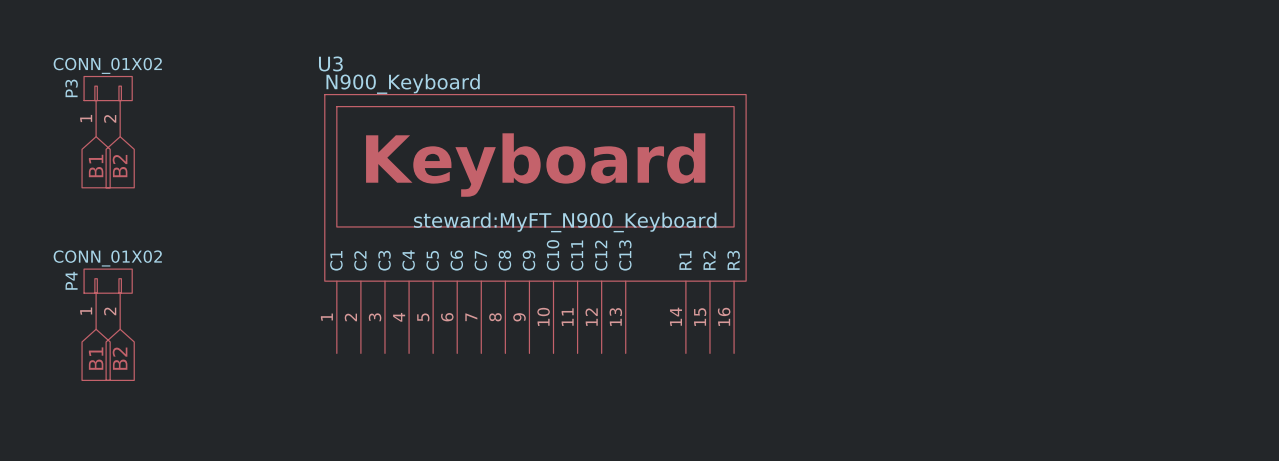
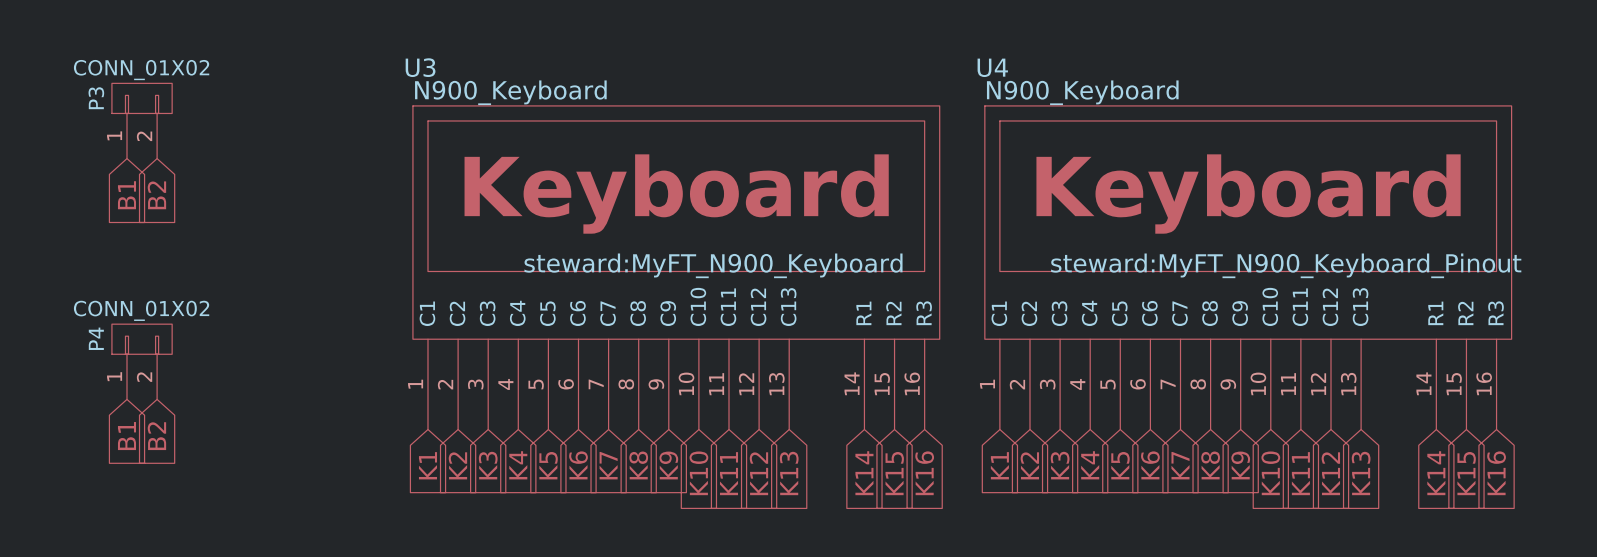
U4: none -> N900_Keyboard (1248, 267)
global label: none -> K1 (427, 465)
global label: none -> K2 (457, 465)
global label: none -> K3 (488, 465)
global label: none -> K4 (518, 465)
global label: none -> K5 (548, 465)
global label: none -> K6 (578, 465)
global label: none -> K7 (608, 465)
global label: none -> K8 (638, 465)
global label: none -> K9 (668, 465)
global label: none -> K1 (999, 465)
global label: none -> K2 (1029, 465)
global label: none -> K3 (1060, 465)
global label: none -> K4 (1090, 465)
global label: none -> K5 (1120, 465)
global label: none -> K6 (1150, 465)
global label: none -> K7 (1180, 465)
global label: none -> K8 (1210, 465)
global label: none -> K9 (1240, 465)
global label: none -> K10 (698, 473)
global label: none -> K11 (728, 473)
global label: none -> K12 (758, 473)
global label: none -> K13 (789, 473)
global label: none -> K14 (864, 473)
global label: none -> K15 (894, 473)
global label: none -> K16 (924, 473)
global label: none -> K10 (1270, 473)
global label: none -> K11 (1300, 473)
global label: none -> K12 (1330, 473)
global label: none -> K13 (1361, 473)
global label: none -> K14 (1436, 473)
global label: none -> K15 (1466, 473)
global label: none -> K16 (1496, 473)

